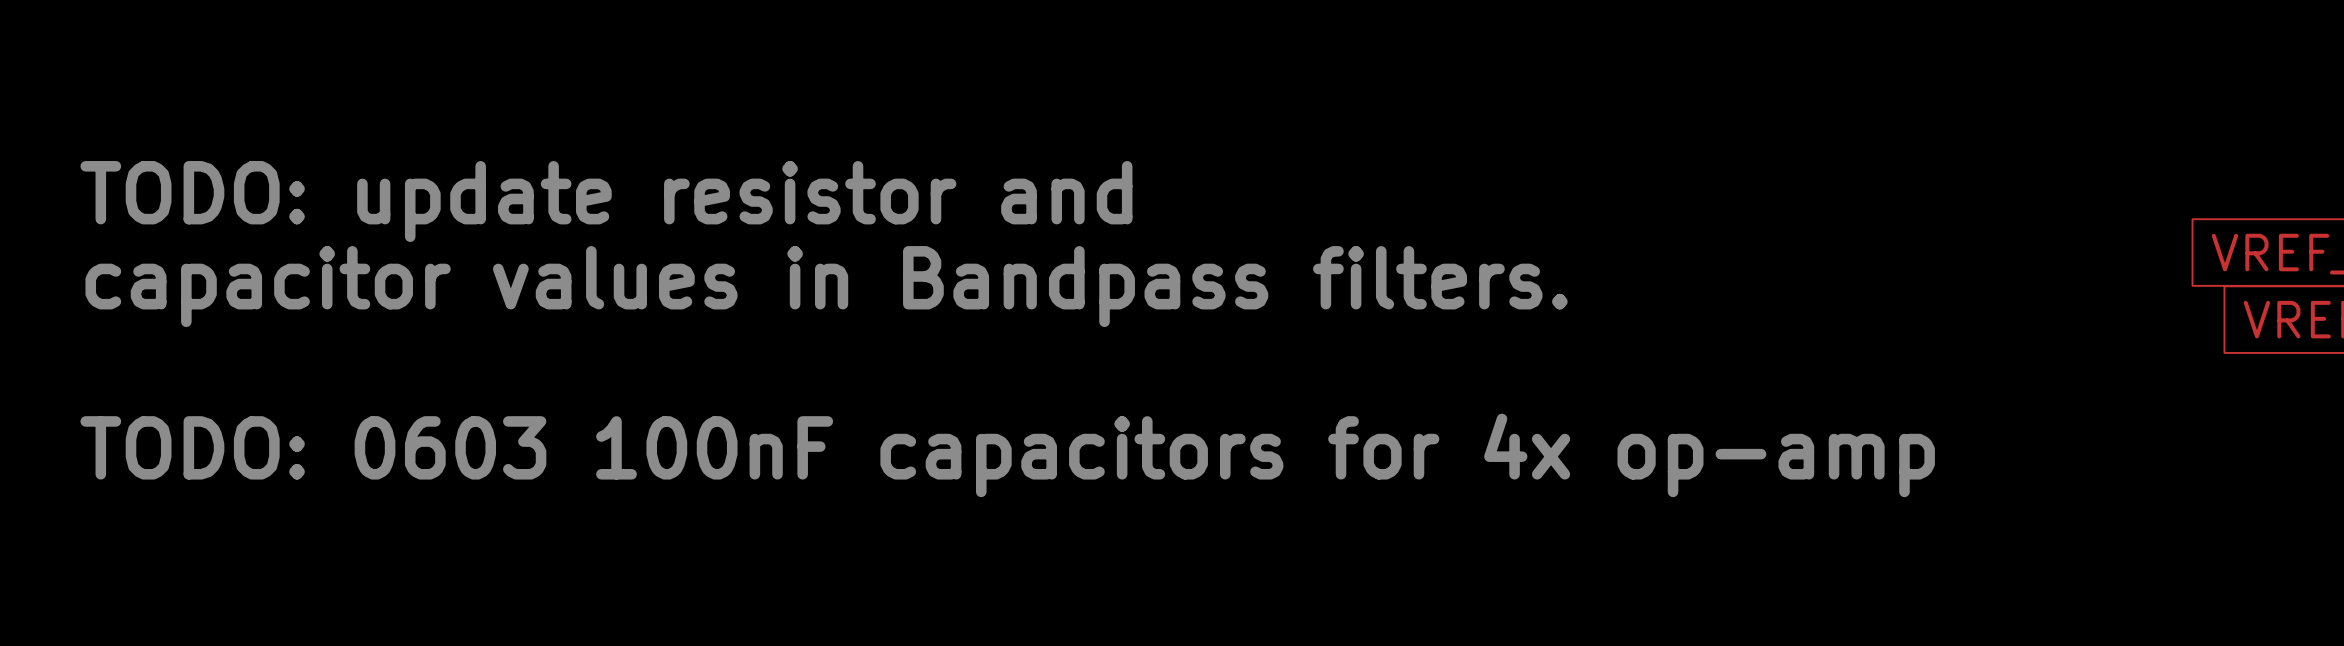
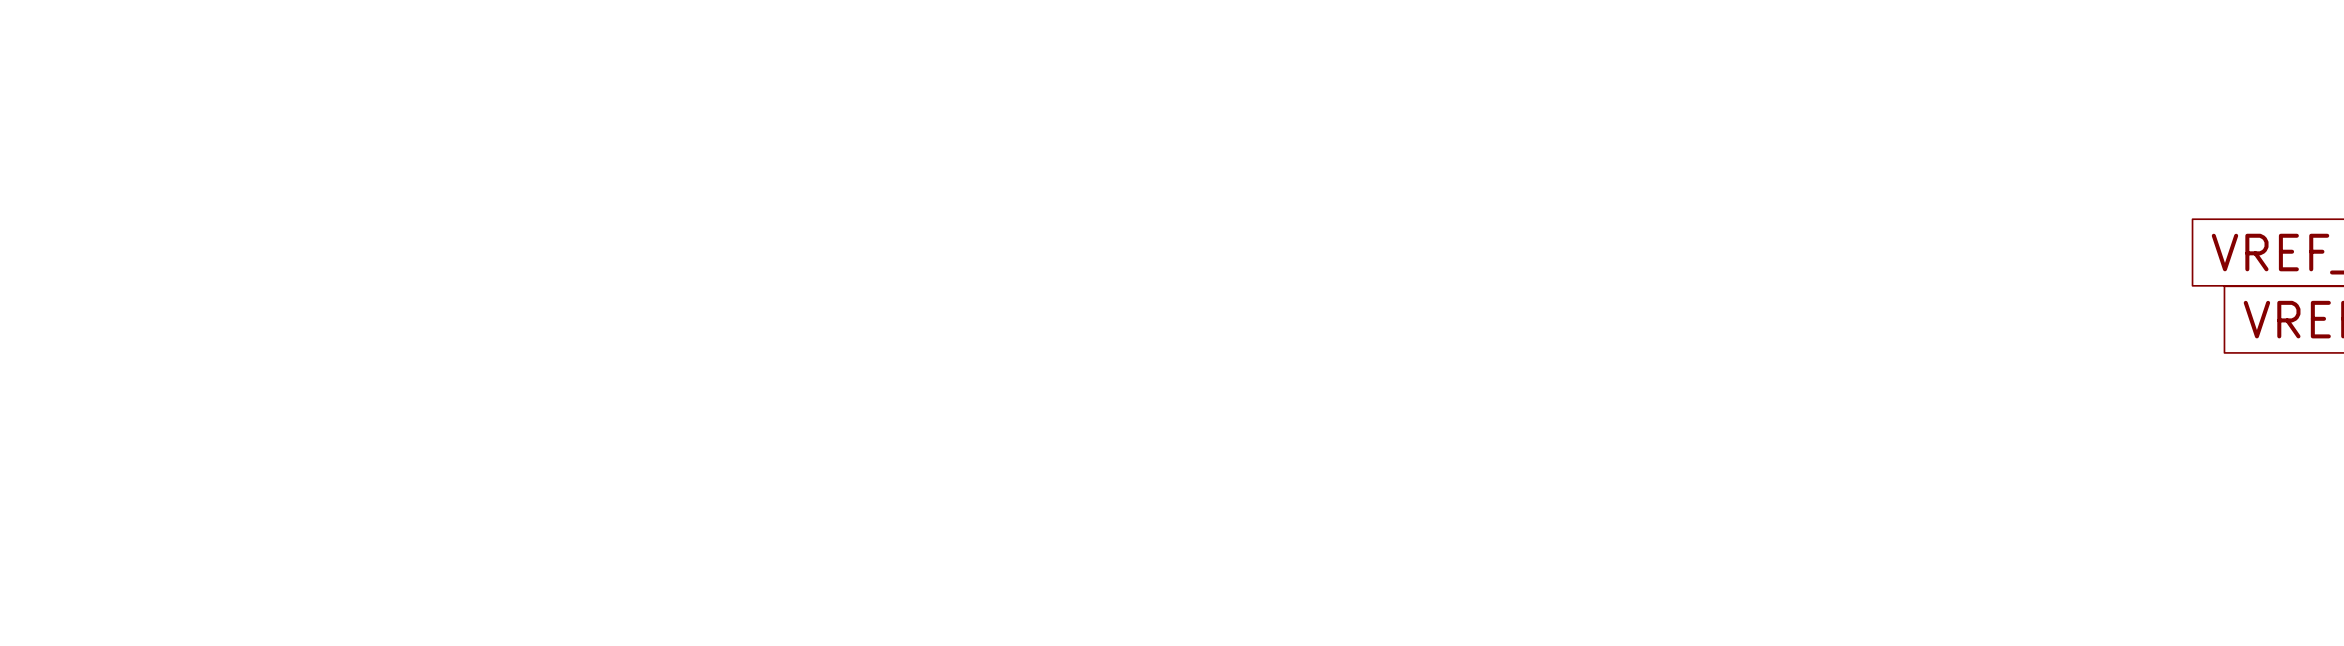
text: TODO: update resistor and (606, 201) -> none
text: capacitor values in Bandpass filters. (826, 286) -> none
text: TODO: 0603 100nF capacitors for 4x op-amp (1007, 455) -> none

